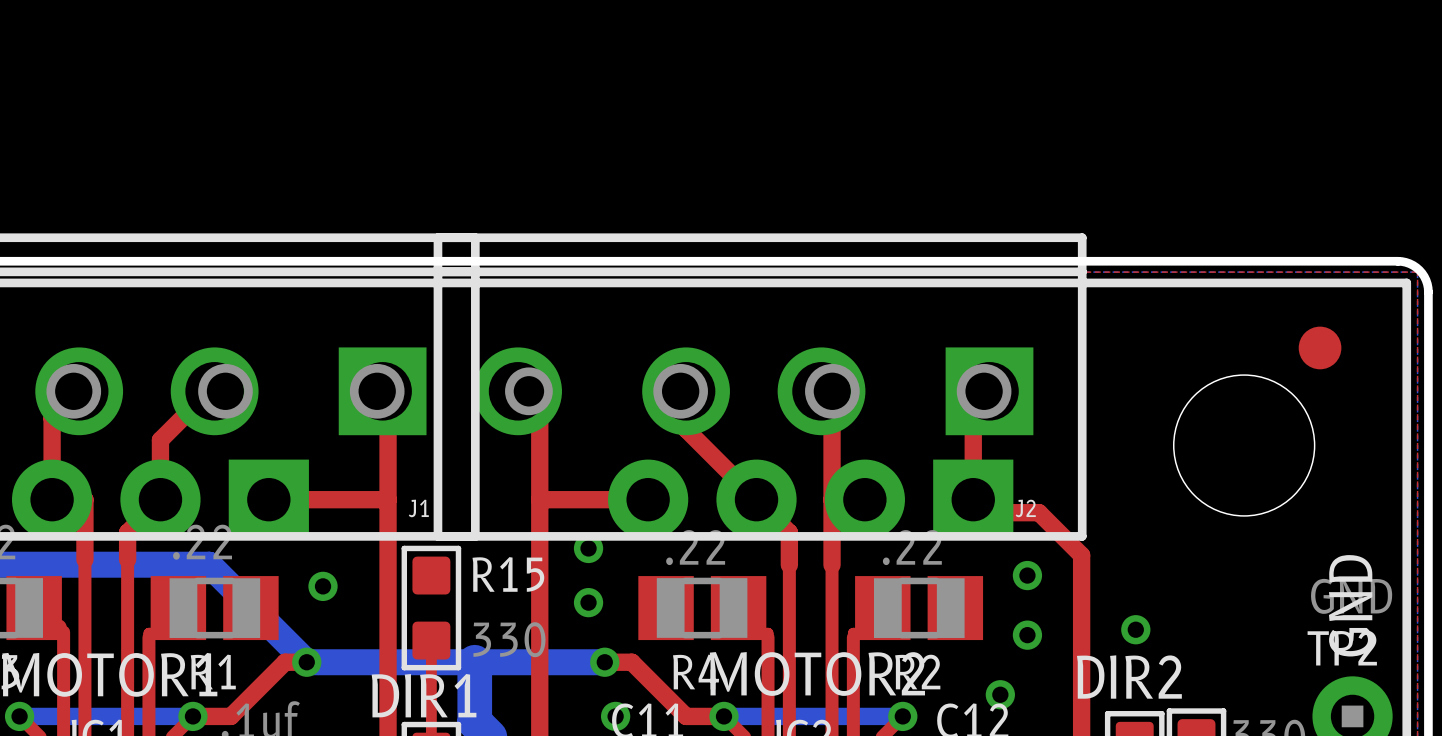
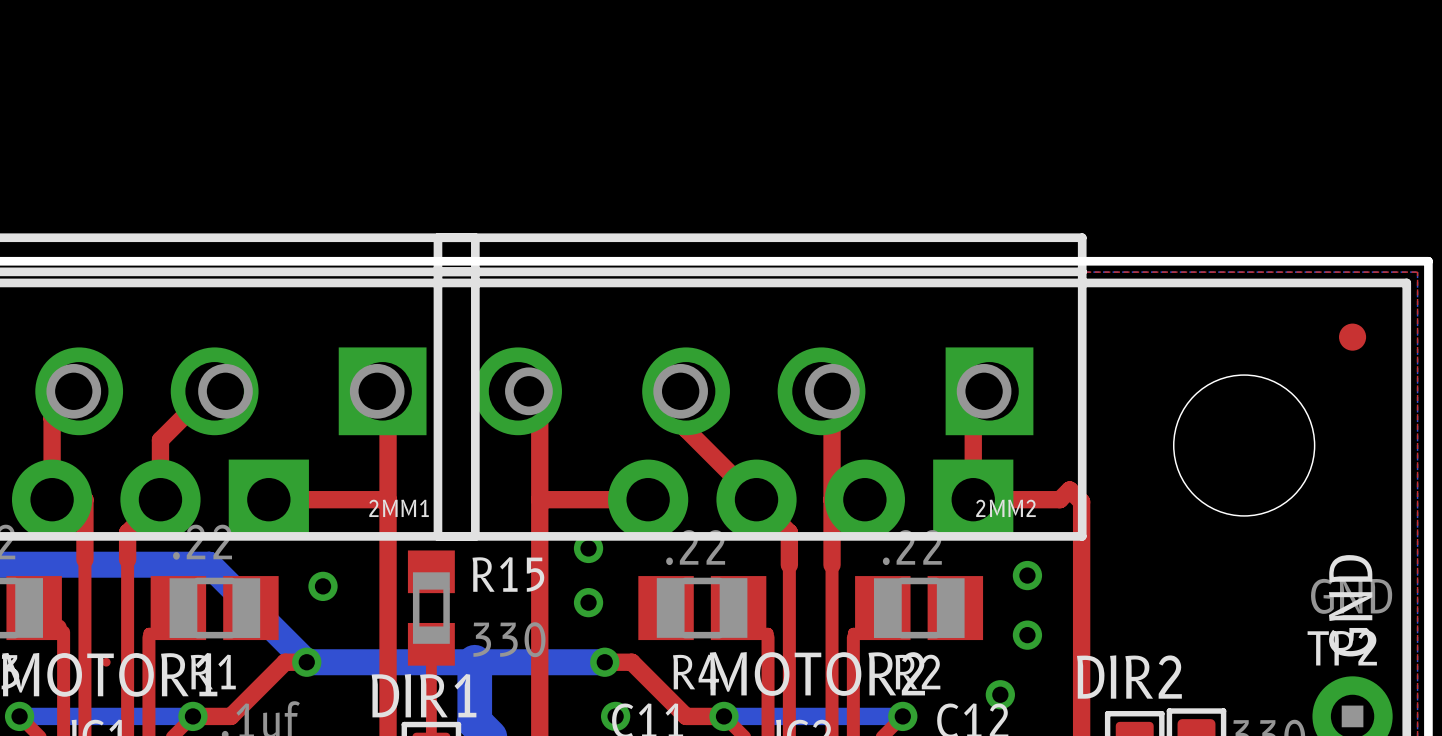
board edge: (1397, 261) (1409, 263) (1419, 270) (1426, 280) (1428, 291) -> (1397, 261) (1428, 261) (1428, 291)
part footprint: [1298, 326, 1342, 370] -> [1339, 323, 1367, 351]
top track: (973, 499) (986, 512) (1039, 512) (1081, 555) -> (973, 499) (1059, 499) (1069, 489) (1081, 501) (1081, 555)
J1 name: J1 (418, 508) -> 2MM1 (399, 508)
J2 name: J2 (1025, 508) -> 2MM2 (1005, 508)
R15 footprint: [401, 545, 462, 671] -> [407, 550, 455, 666]
via: (1135, 629) -> none
part: none -> (106, 662)

